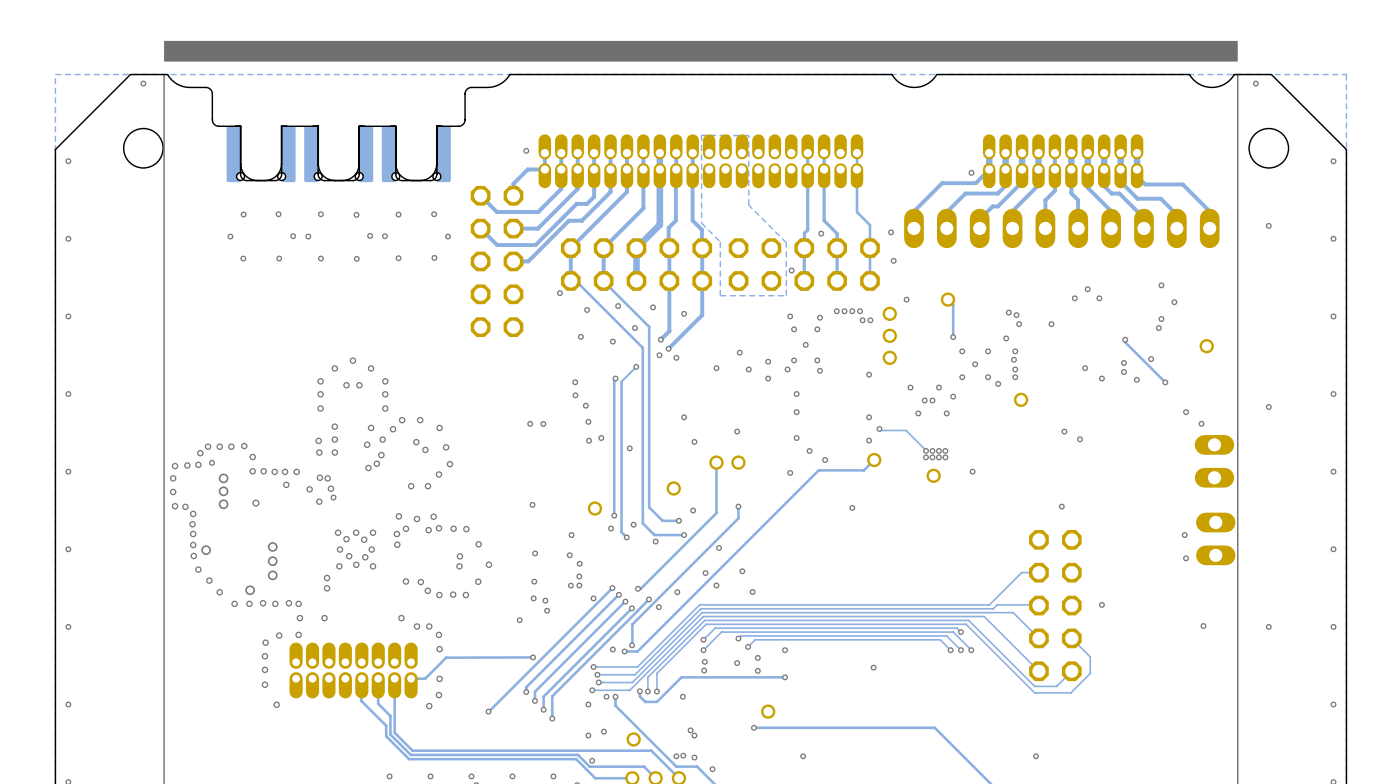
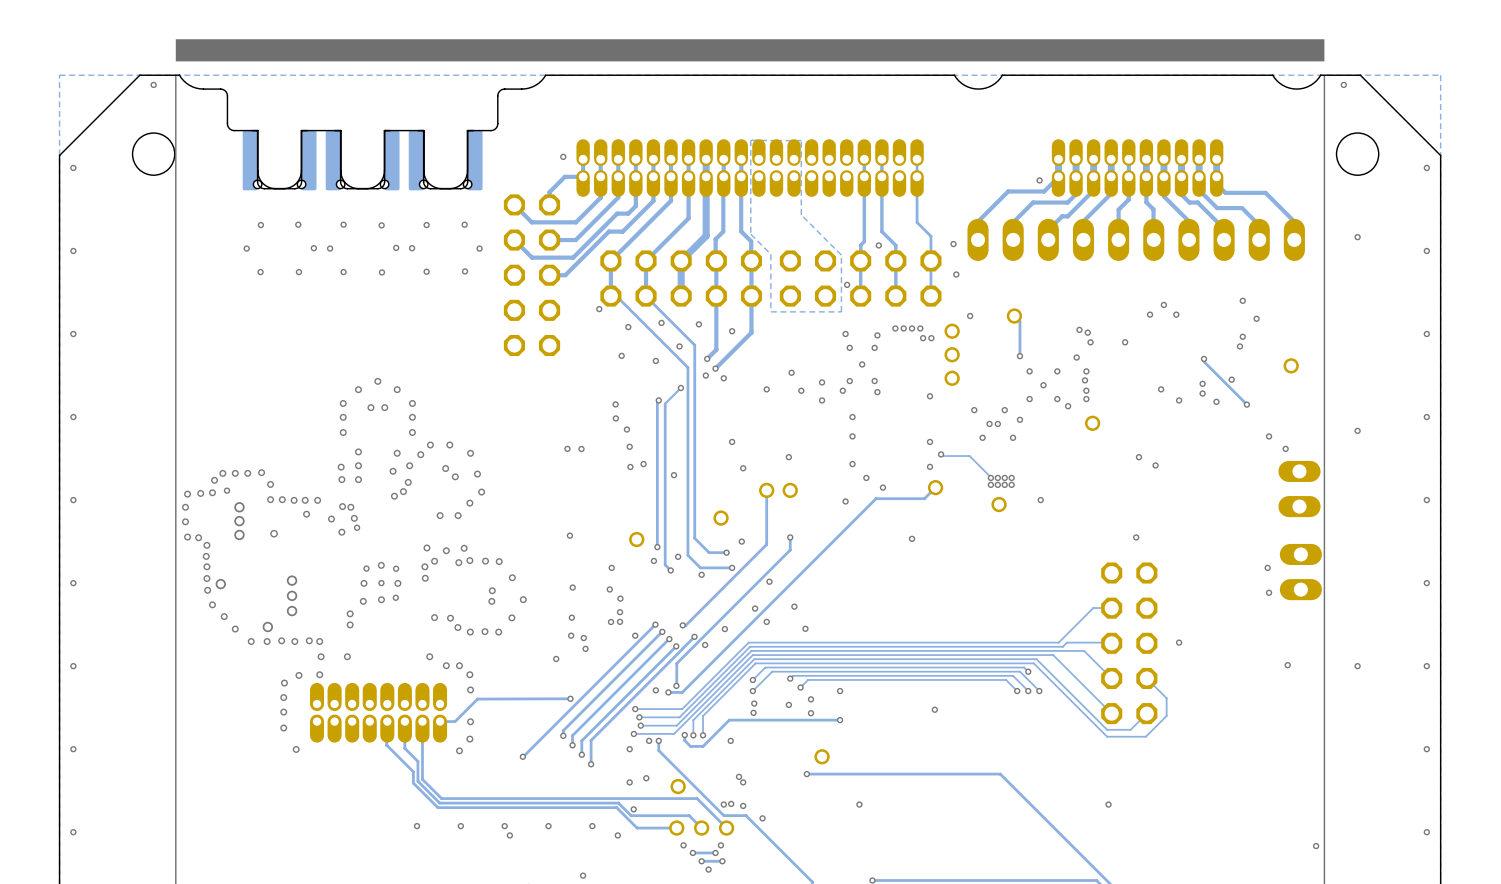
via: (338, 532) -> none
via: (372, 532) -> none
via: none -> (366, 568)
via: none -> (396, 568)
via: (346, 539) -> none
via: (364, 539) -> none
via: none -> (381, 583)
via: (349, 556) -> none
via: (365, 557) -> none
via: none -> (395, 597)
via: (372, 566) -> none

